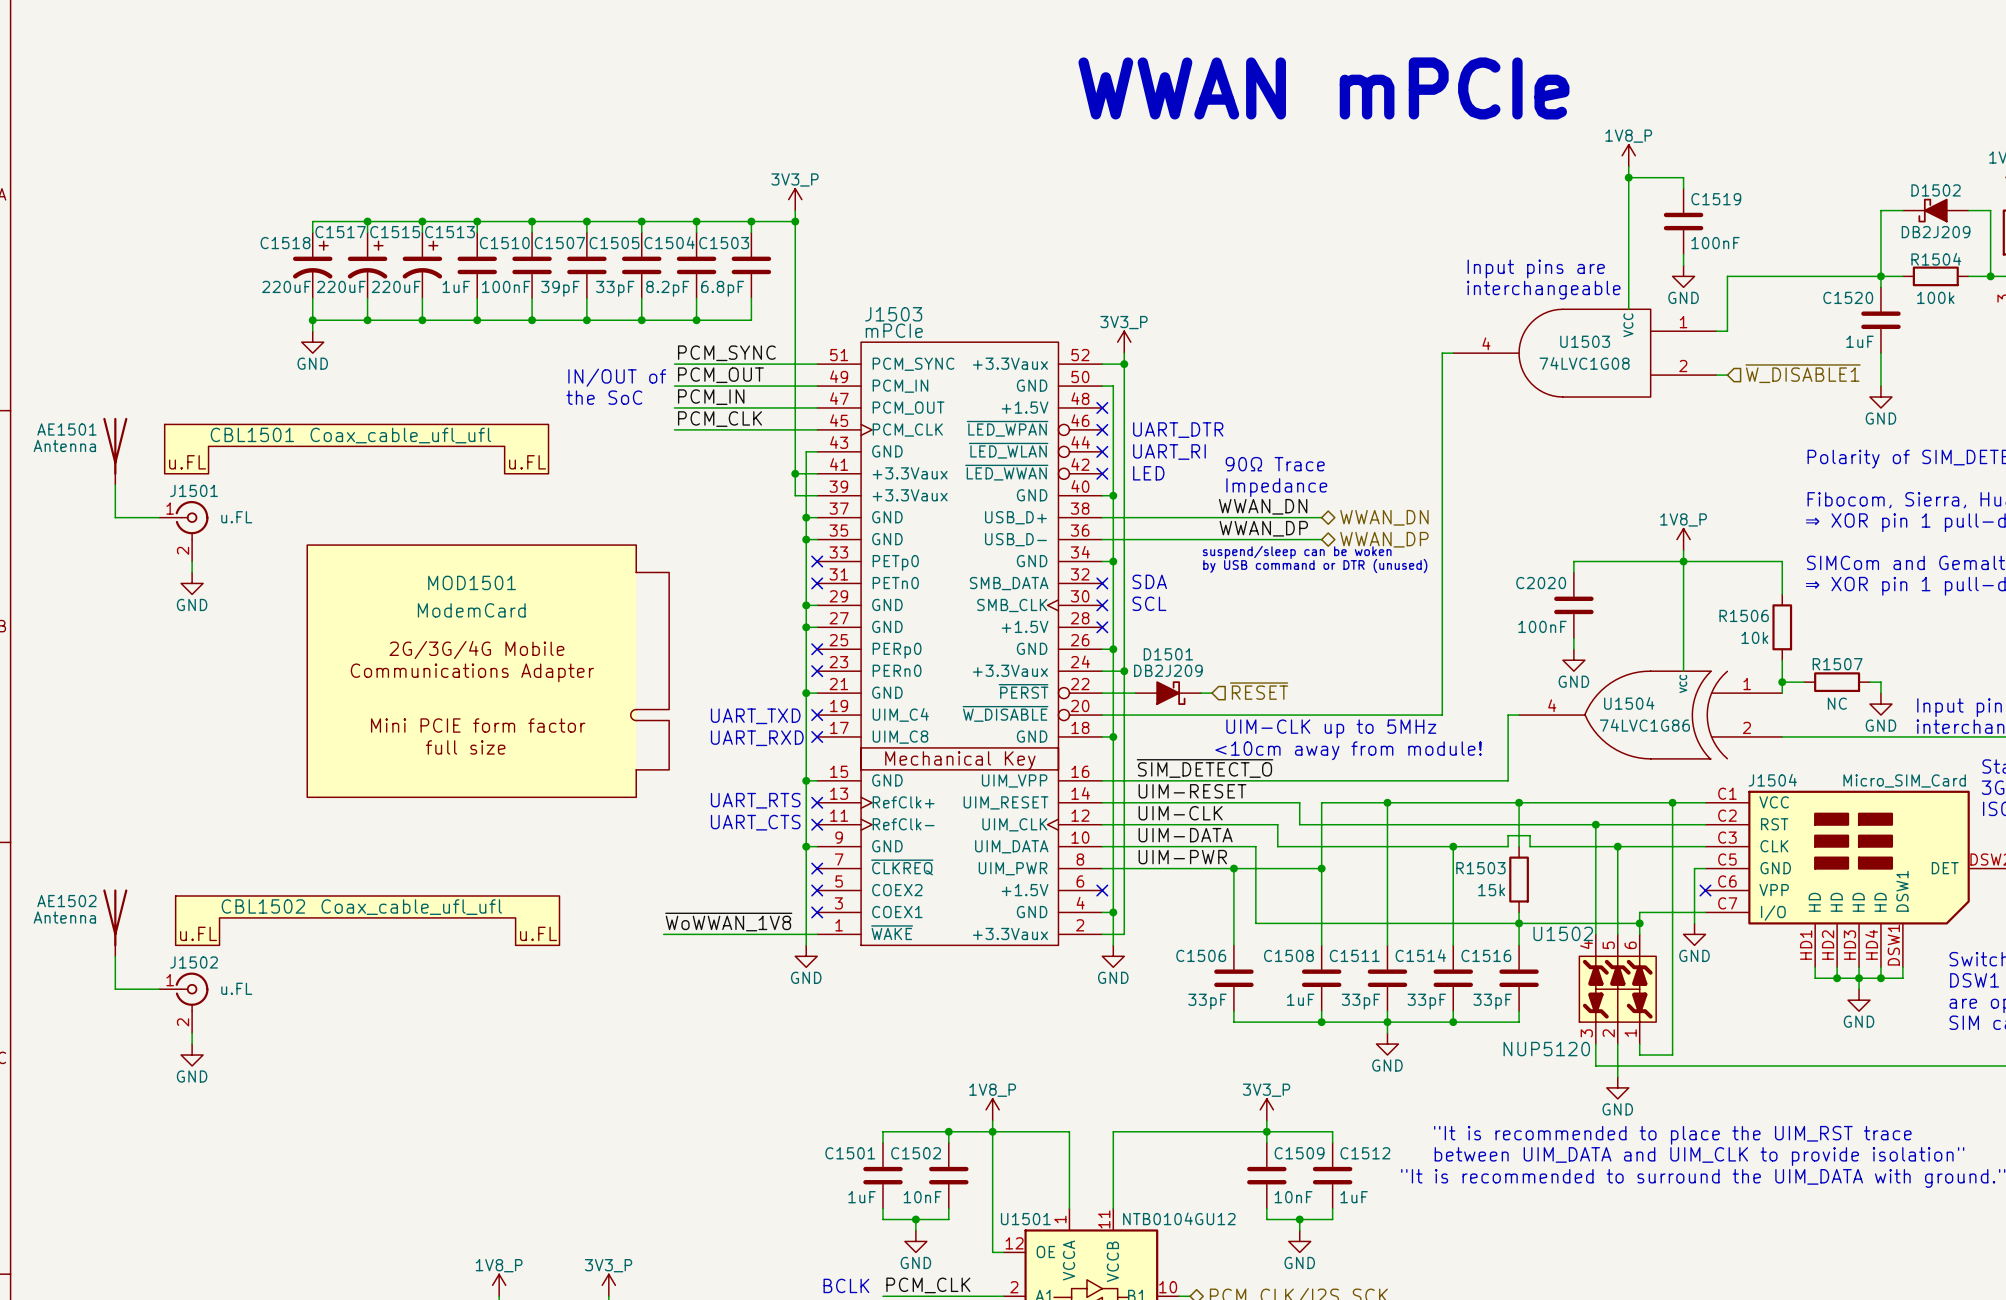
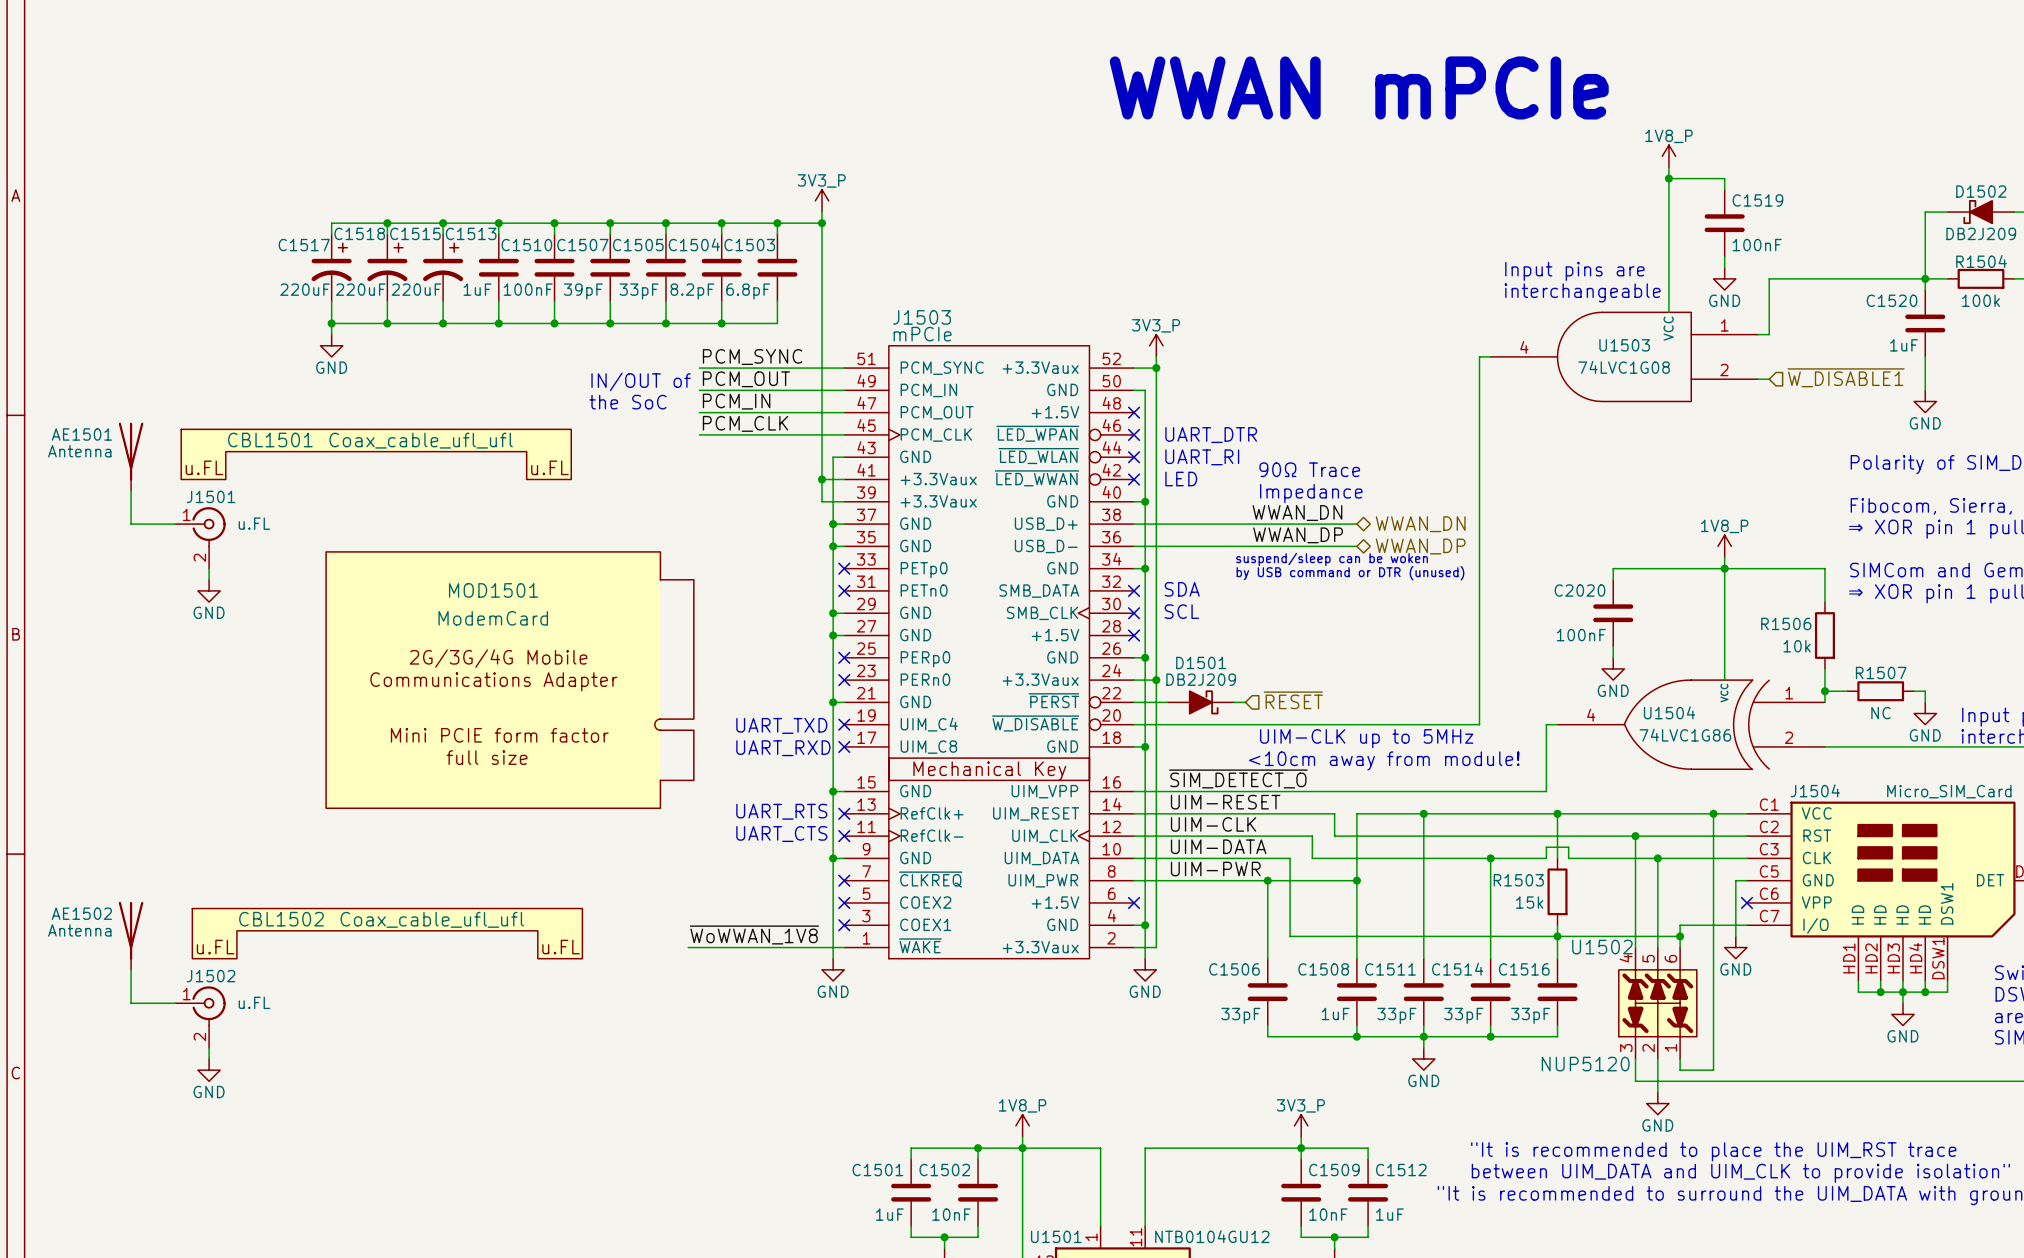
C1517 name: C1517 (340, 232) -> C1518 (359, 233)
C1518 name: C1518 (285, 243) -> C1517 (304, 245)

